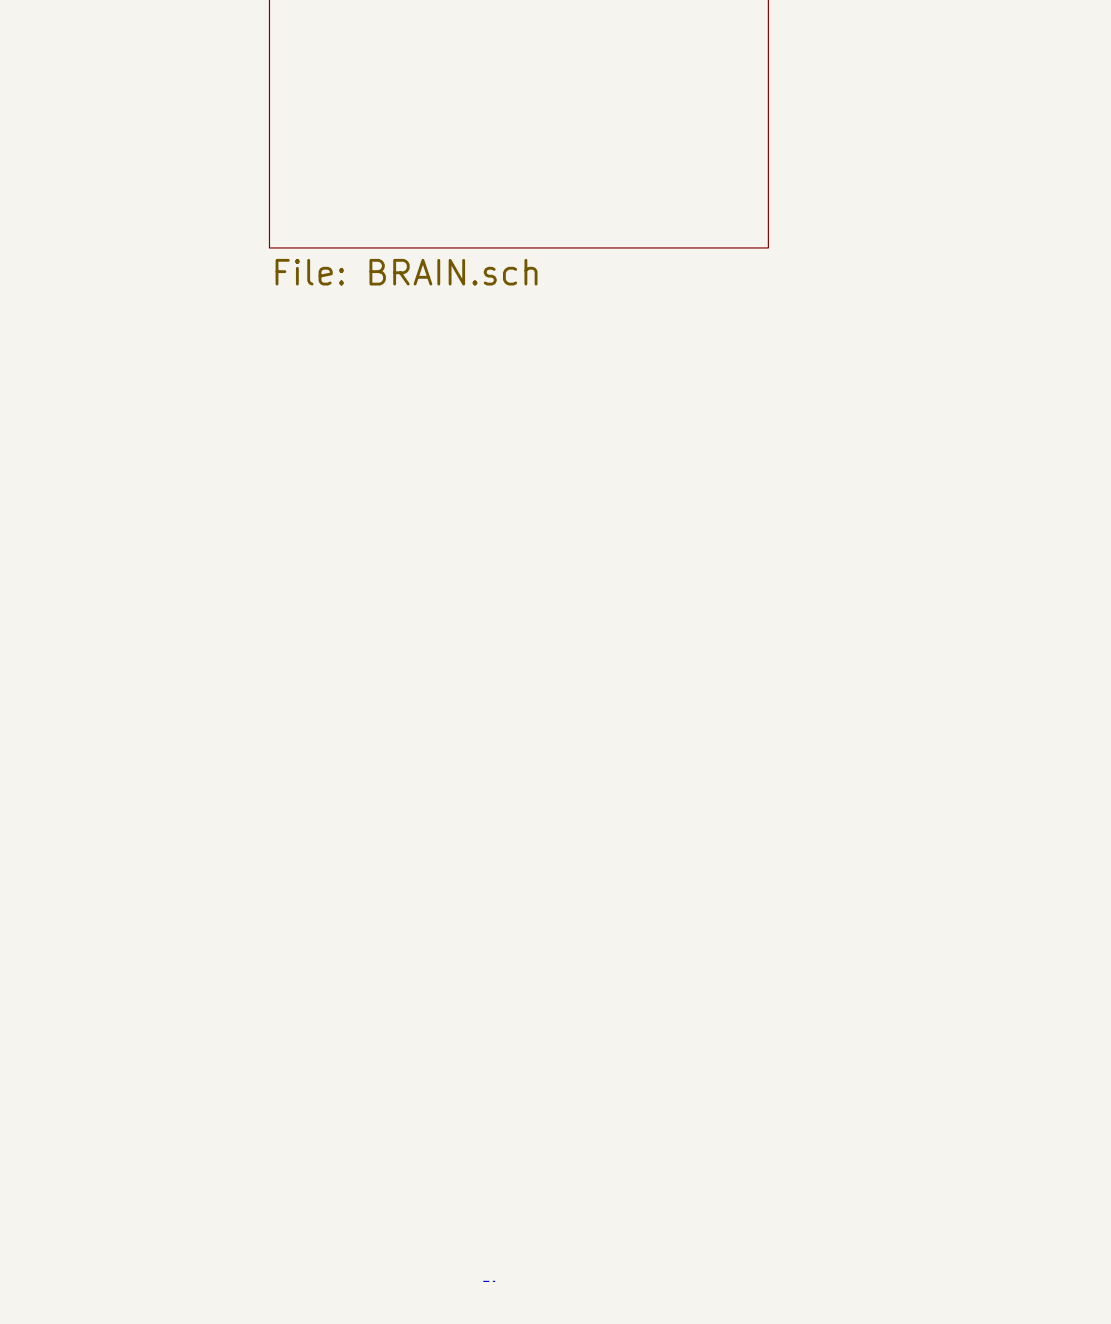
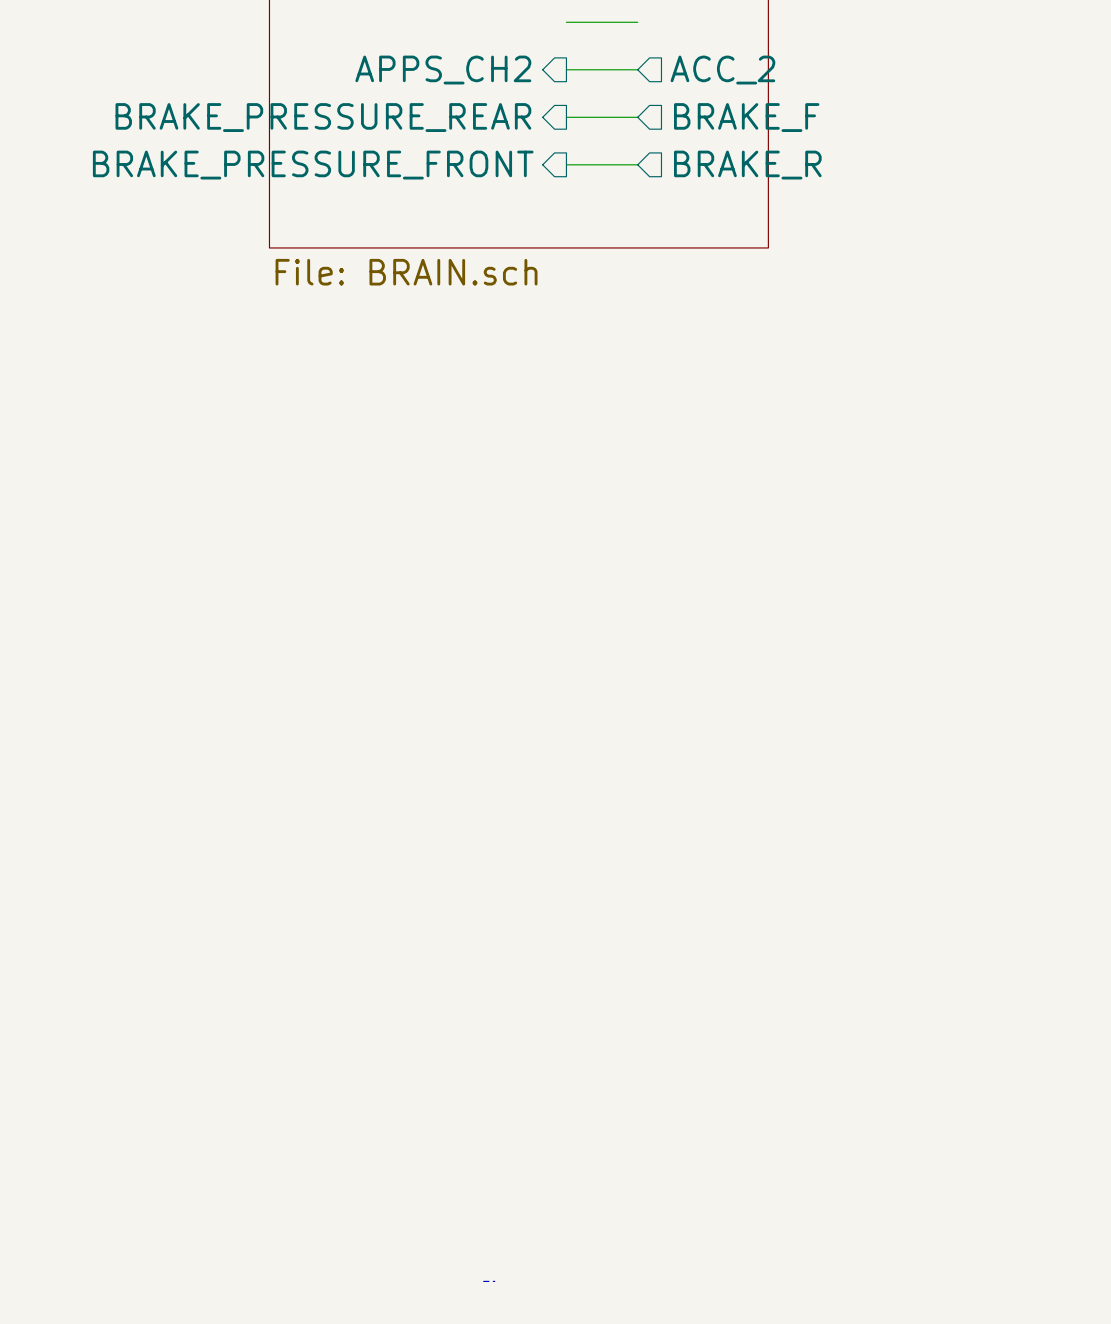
wire: none -> (566, 22) (637, 22)
wire: none -> (566, 69) (637, 69)
sheet pin: none -> APPS_CH2 (443, 70)
sheet pin: none -> ACC_2 (722, 70)
sheet pin: none -> BRAKE_PRESSURE_REAR (323, 117)
wire: none -> (566, 117) (637, 117)
sheet pin: none -> BRAKE_F (746, 117)
wire: none -> (566, 164) (637, 164)
sheet pin: none -> BRAKE_PRESSURE_FRONT (313, 165)
sheet pin: none -> BRAKE_R (747, 165)

